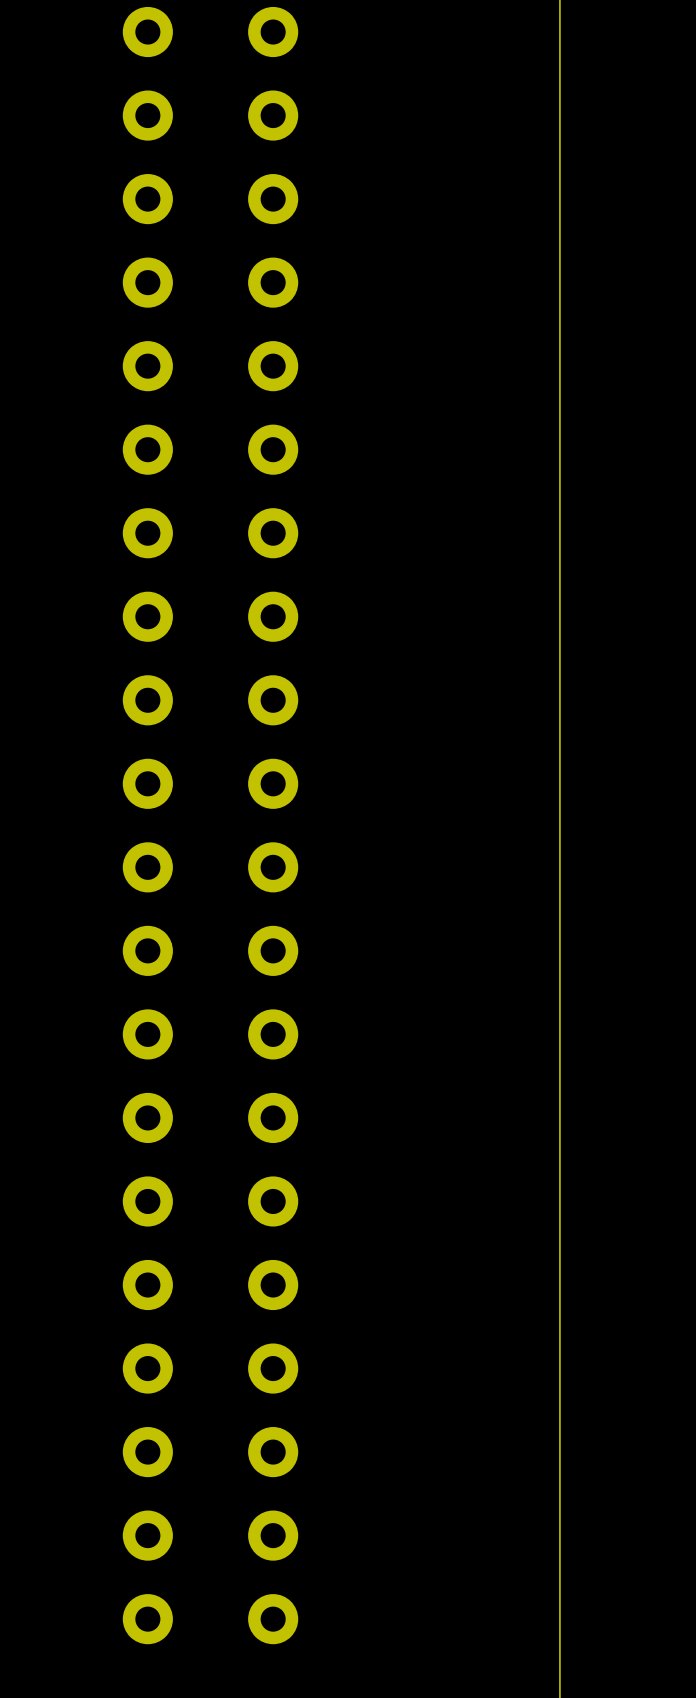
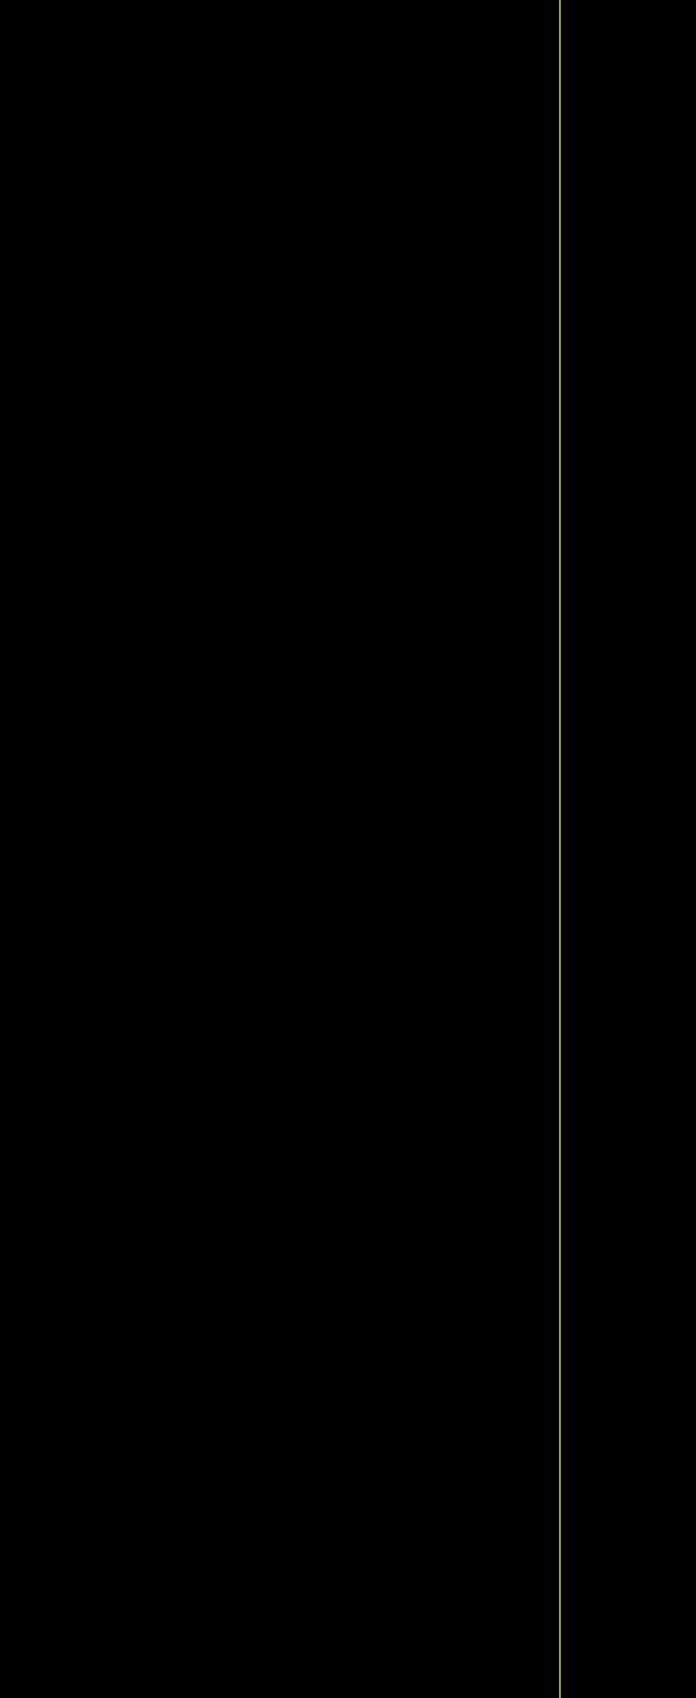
part: (147, 825) -> none
part: (273, 825) -> none

